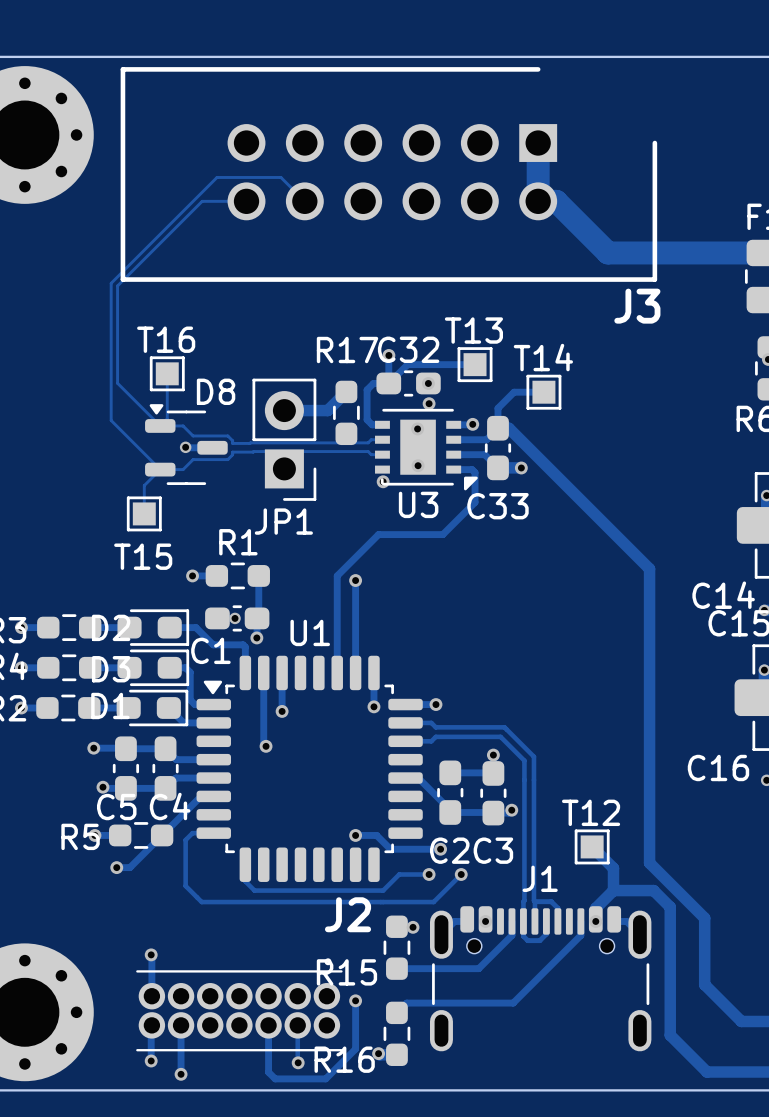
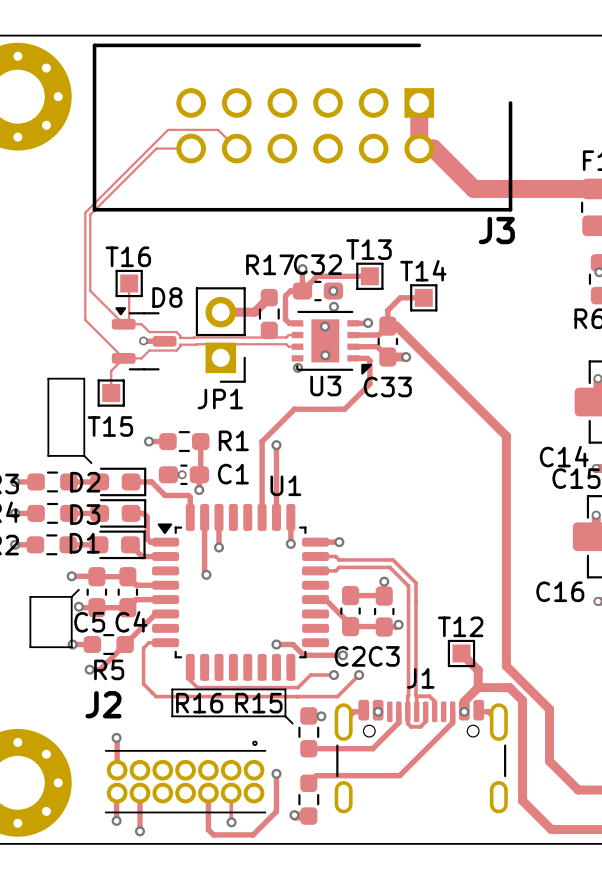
R1 name position: R1 (238, 542) -> R1 (233, 440)
line: none -> (84, 455) (84, 378) (48, 378) (48, 455) (84, 455)
line: none -> (84, 455) (91, 463)
U1 name position: U1 (310, 632) -> U1 (285, 485)
C1 name position: C1 (210, 650) -> C1 (233, 474)
line: none -> (78, 589) (71, 596)
line: none -> (71, 596) (30, 596) (30, 647) (71, 647) (71, 596)
R5 name position: R5 (80, 836) -> R5 (109, 669)
J2 name position: J2 (348, 914) -> J2 (103, 704)
line: none -> (285, 716) (292, 723)
line: none -> (285, 716) (285, 689) (172, 689) (172, 716) (285, 716)
R15 name position: R15 (346, 972) -> R15 (258, 703)
R16 name position: R16 (344, 1059) -> R16 (199, 703)

